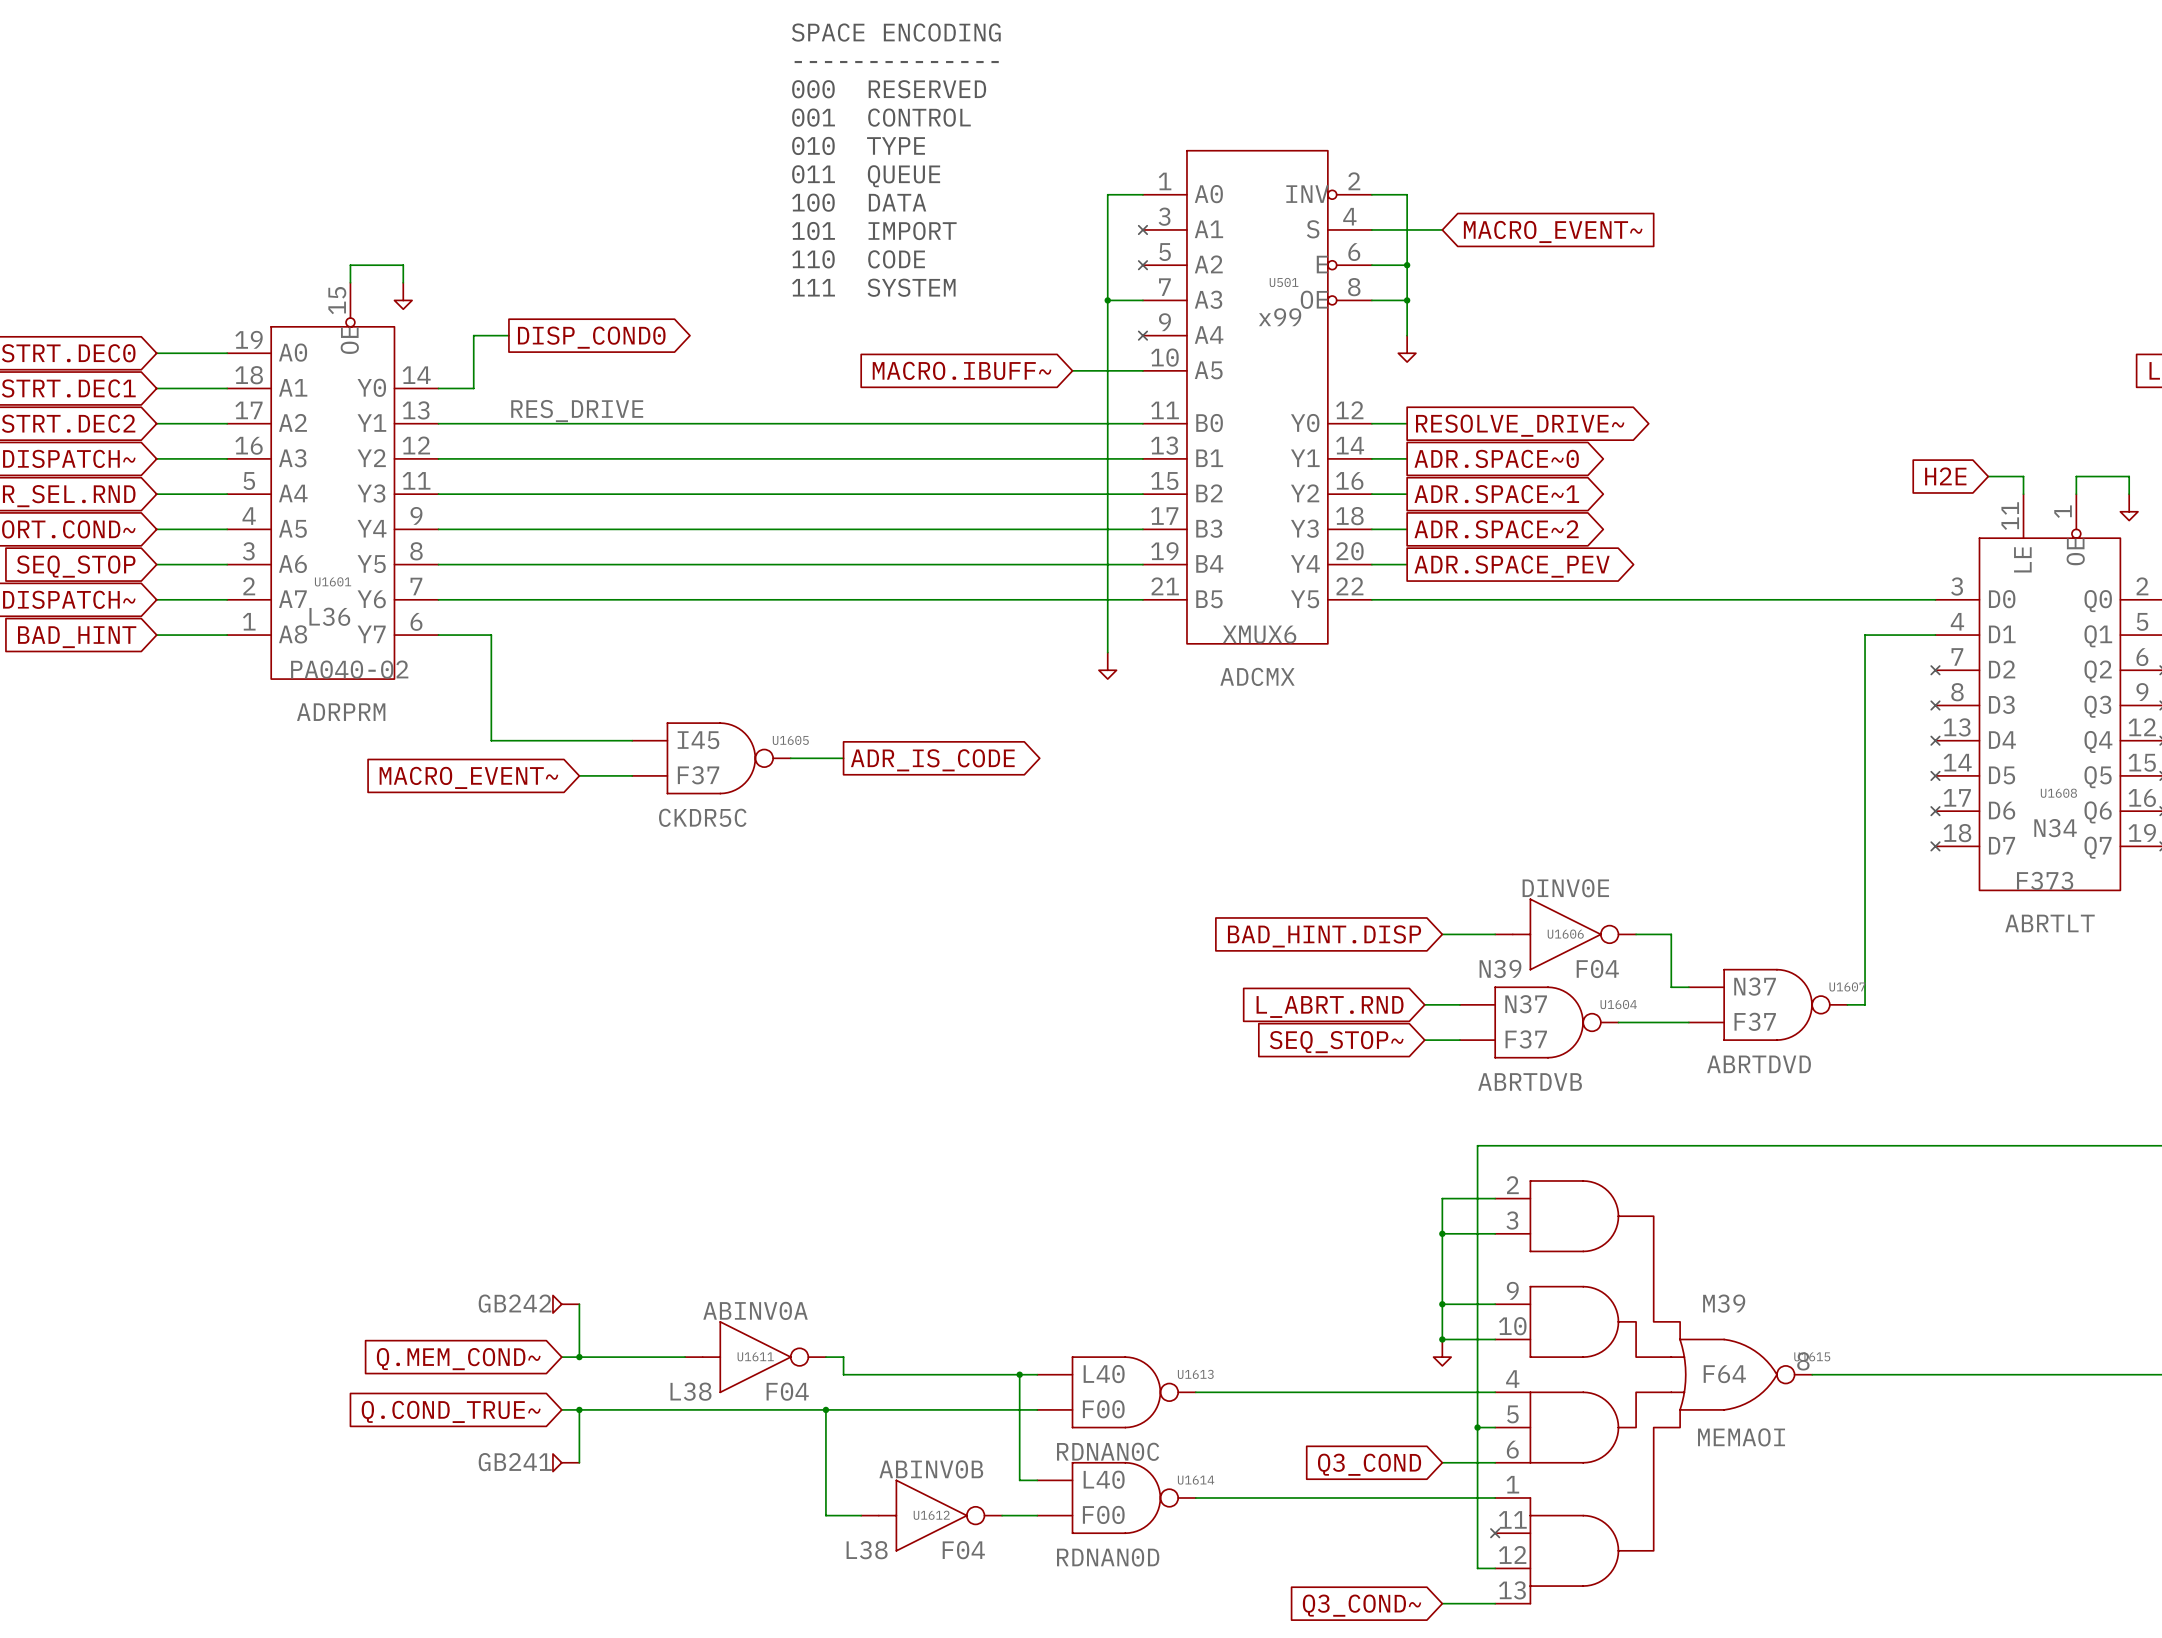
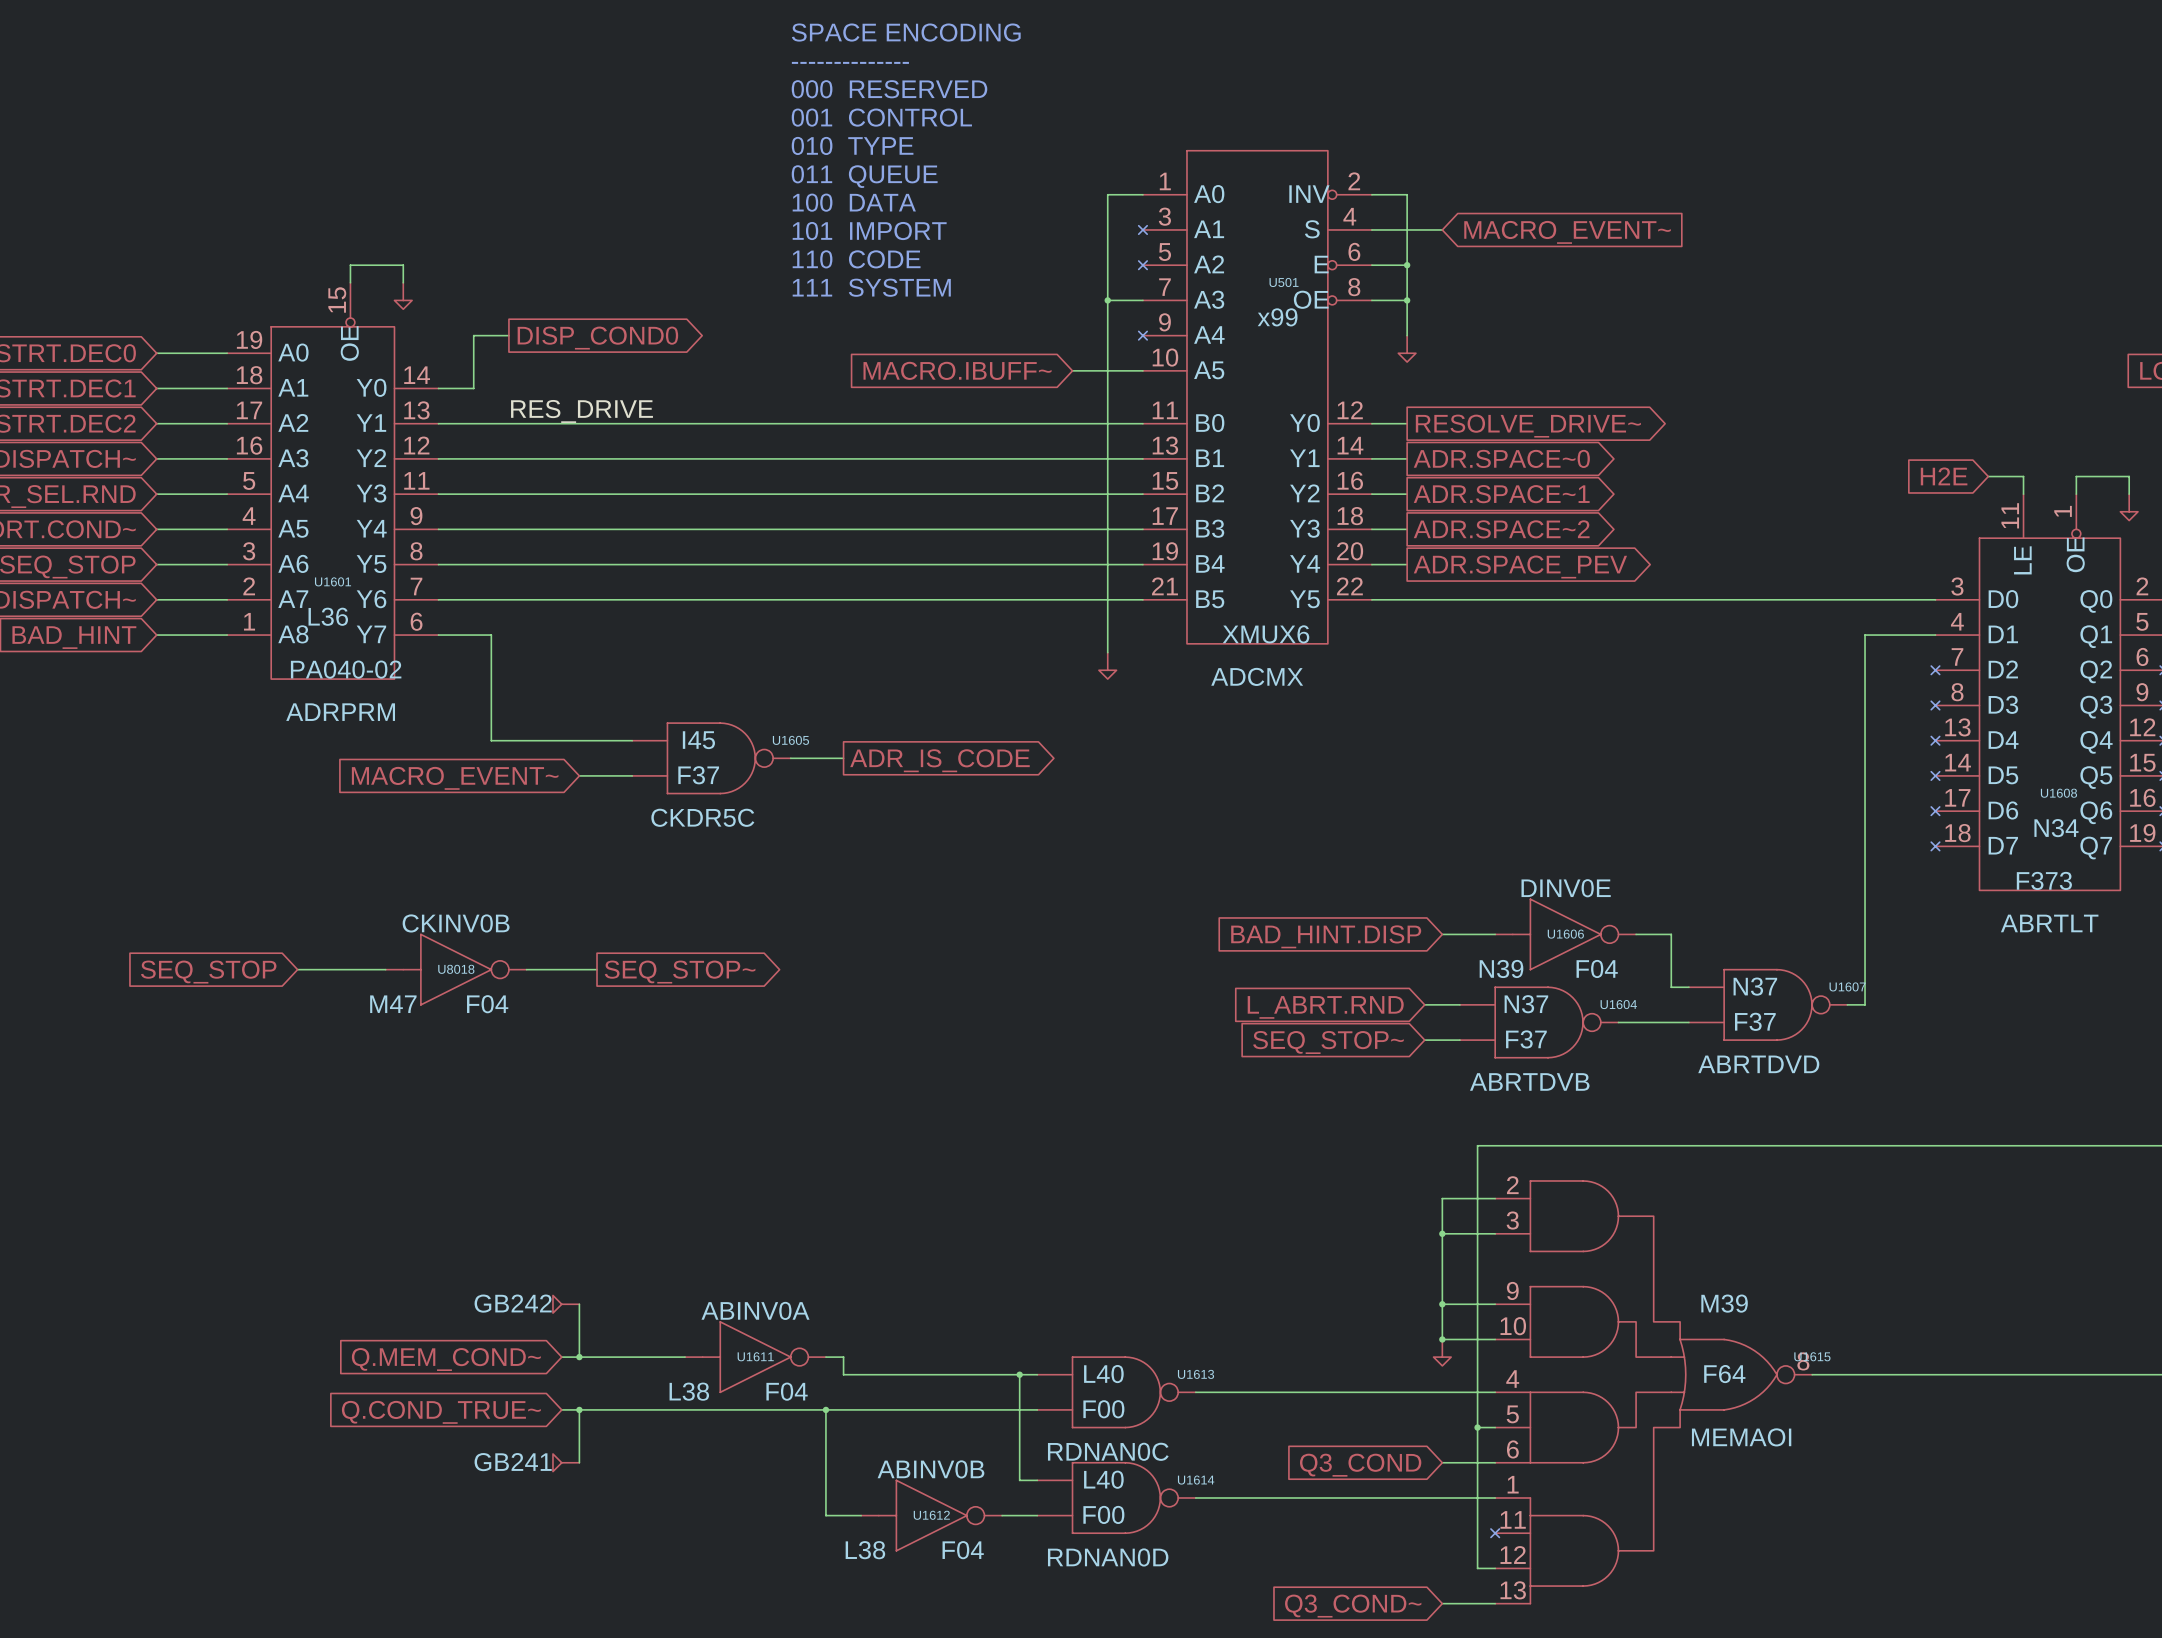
wire: none -> (297, 969) (385, 969)
U8018: none -> F04 (456, 969)
wire: none -> (526, 969) (597, 969)
global label: none -> SEQ_STOP (208, 972)
global label: none -> SEQ_STOP~ (680, 972)

